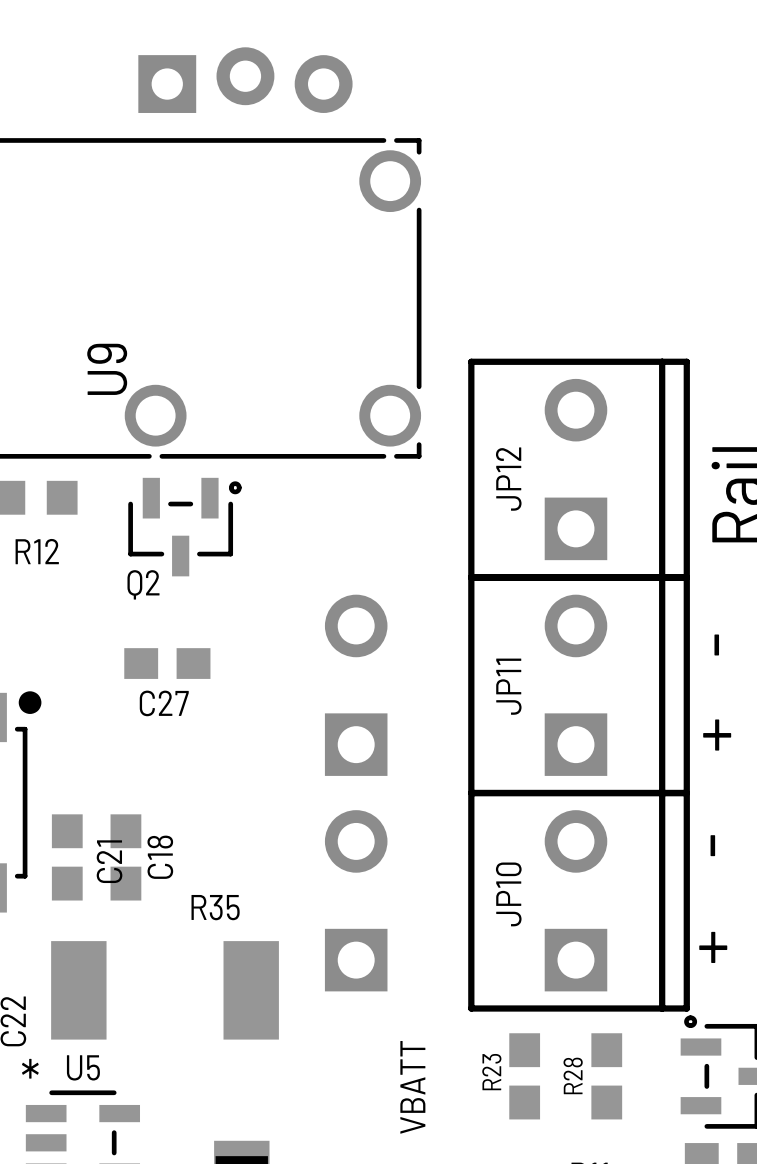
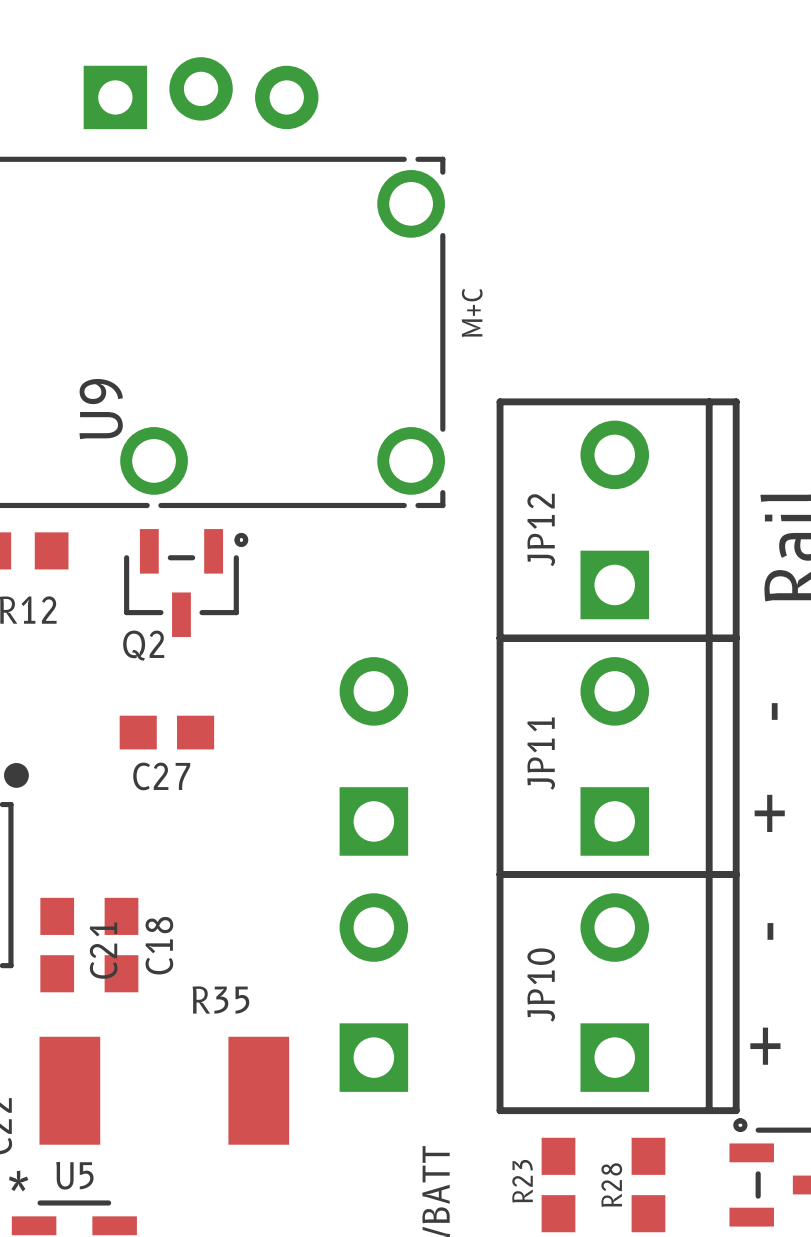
part position: (245, 80) -> (201, 93)
text: none -> M+C (472, 312)

